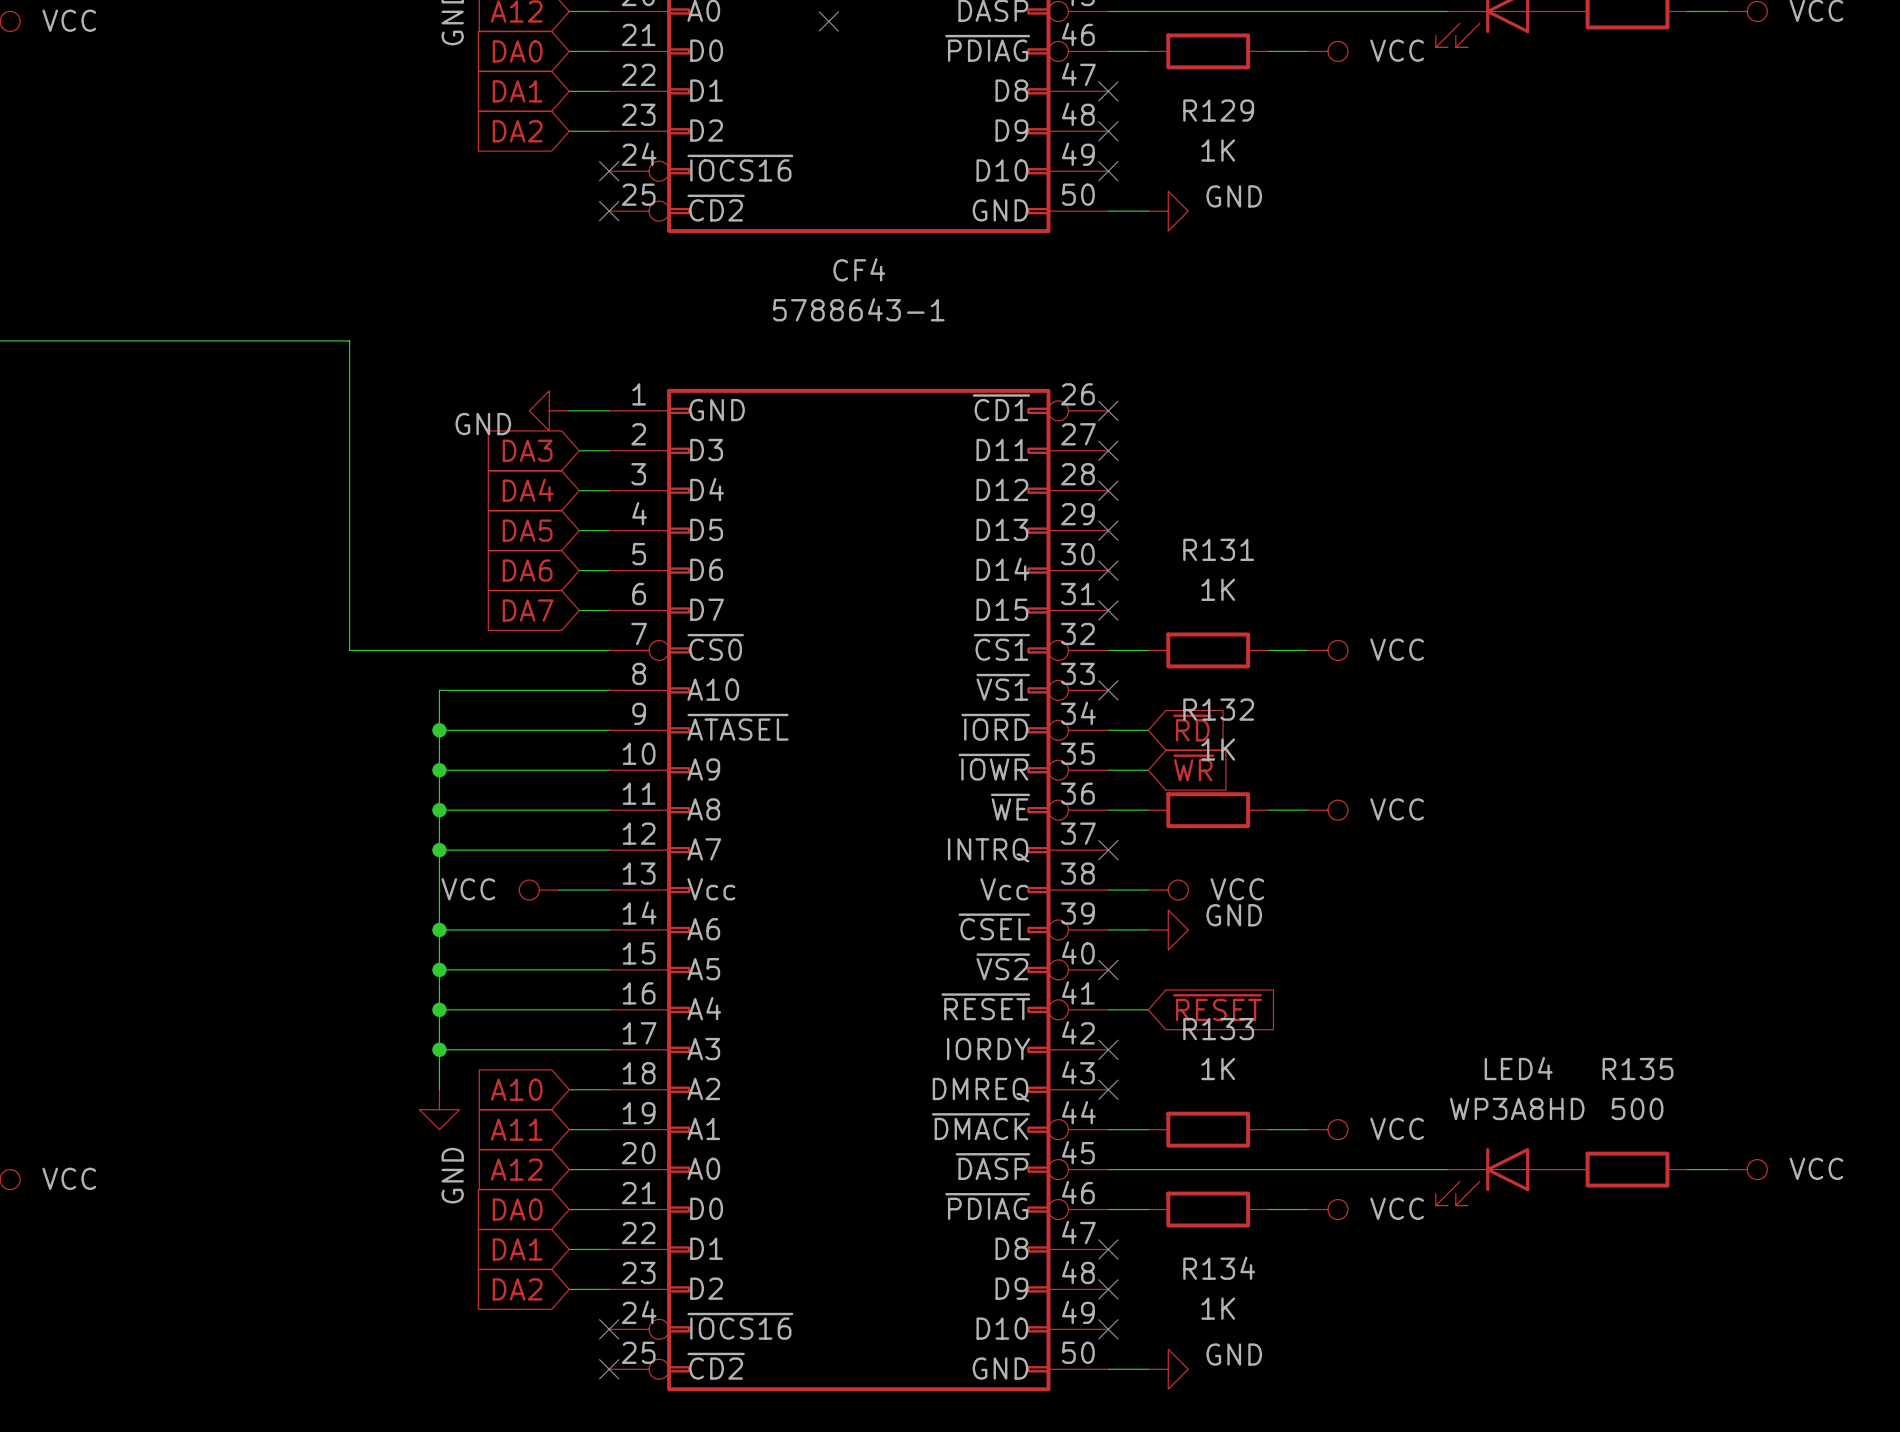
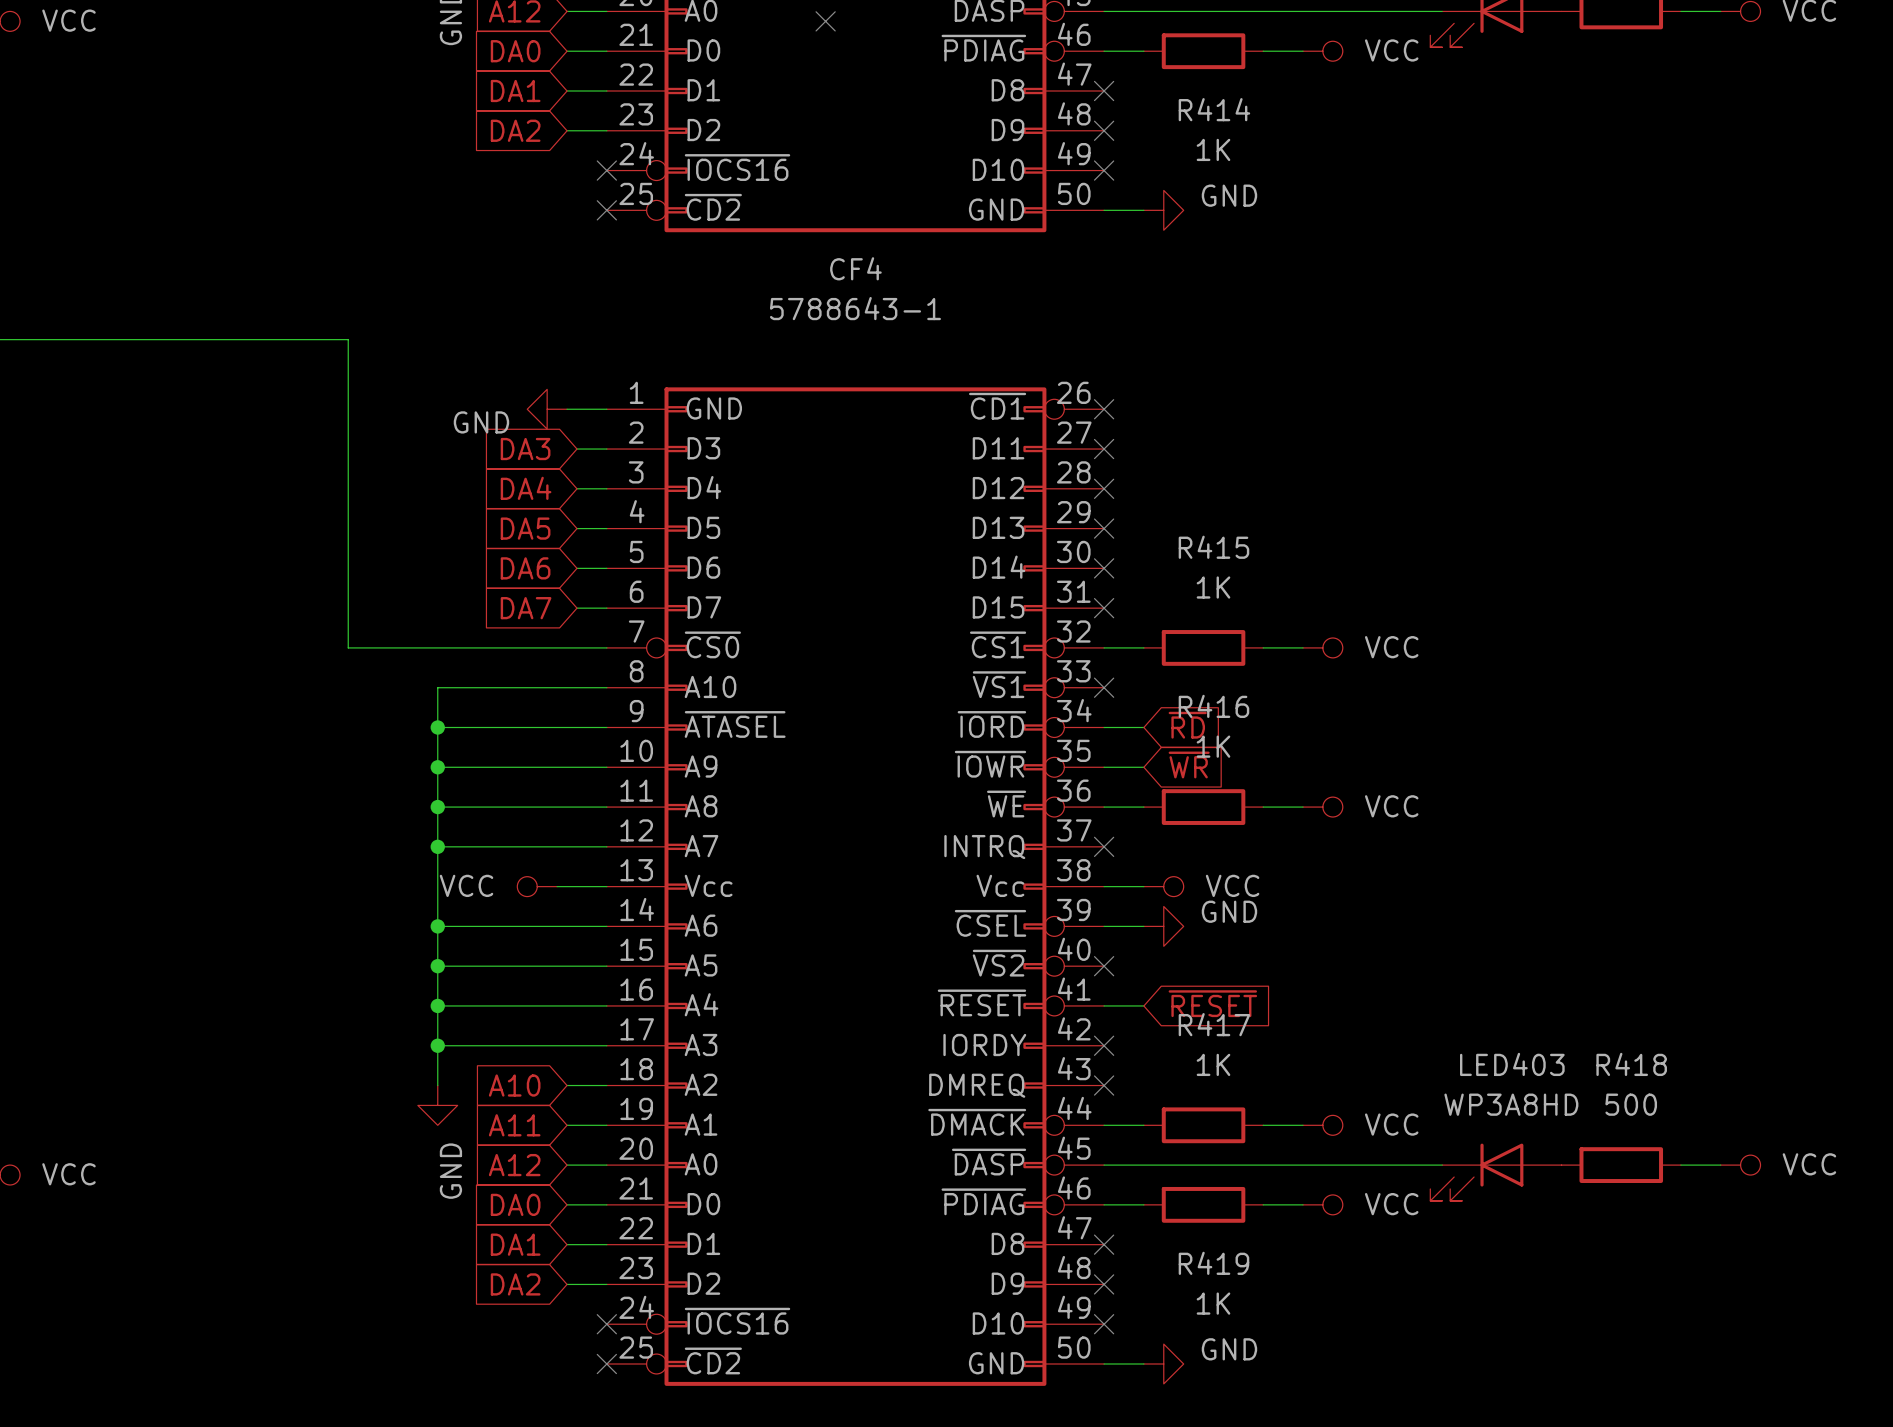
R129 name: R129 (1218, 110) -> R414 (1214, 109)
R131 name: R131 (1218, 549) -> R415 (1213, 547)
R132 name: R132 (1218, 709) -> R416 (1213, 706)
R133 name: R133 (1218, 1029) -> R417 (1214, 1024)
LED4 name: LED4 (1518, 1068) -> LED403 (1512, 1064)
R135 name: R135 (1637, 1069) -> R418 (1631, 1064)
R134 name: R134 (1219, 1268) -> R419 (1213, 1263)

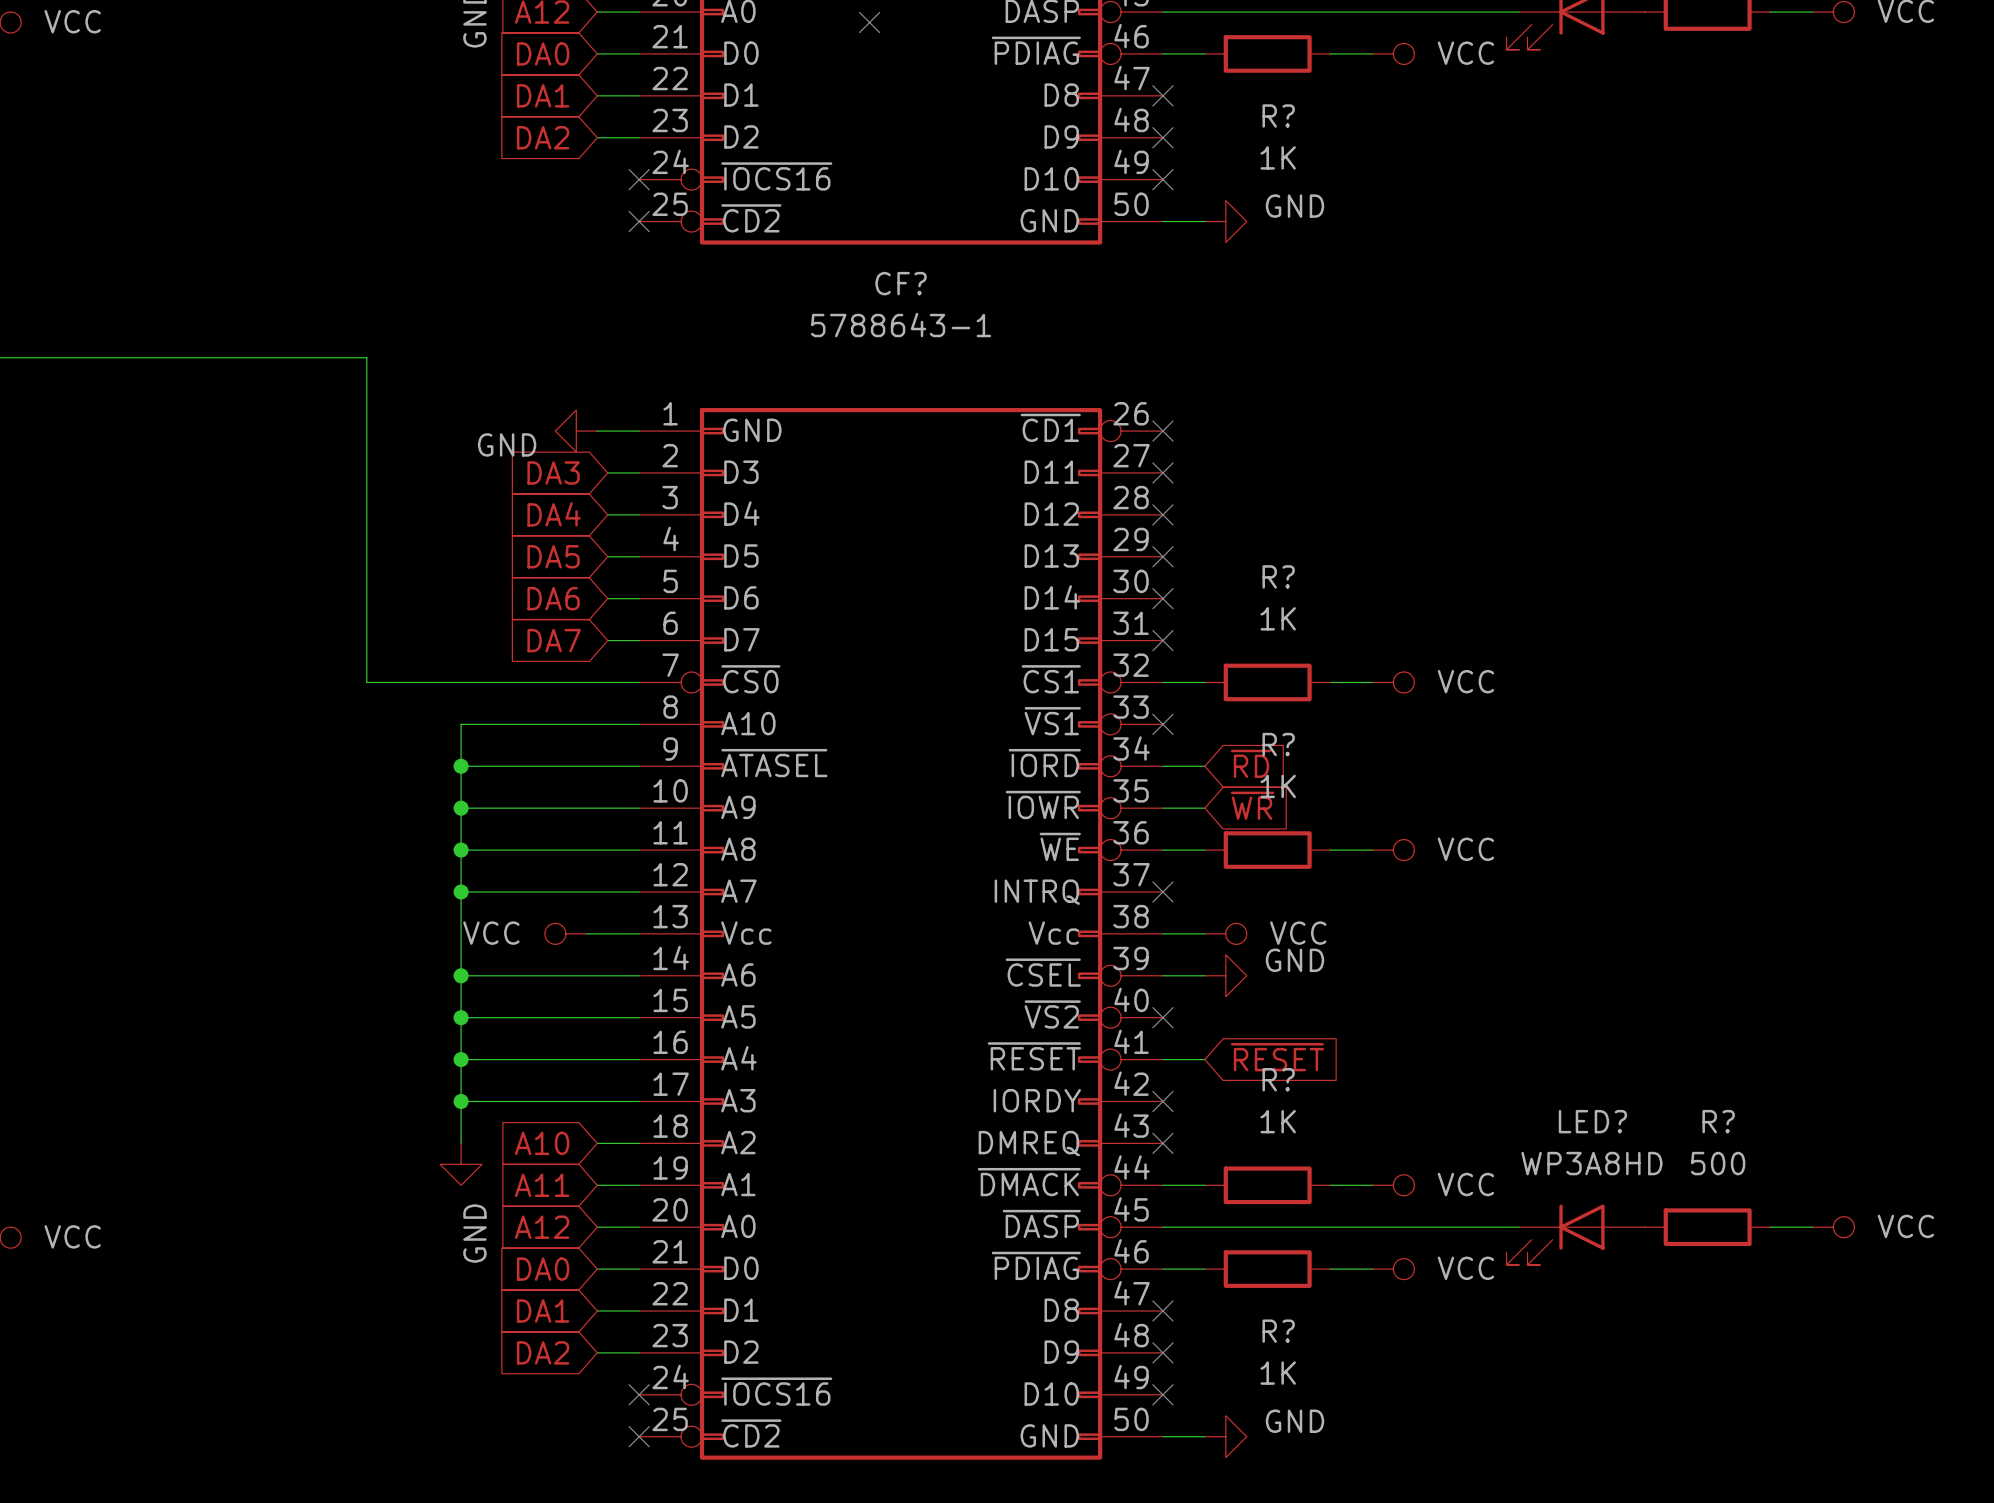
R414 name: R414 (1214, 109) -> R? (1278, 116)
CF4 name: CF4 (855, 268) -> CF? (901, 283)
R415 name: R415 (1213, 547) -> R? (1278, 576)
R416 name: R416 (1213, 706) -> R? (1278, 744)
R417 name: R417 (1214, 1024) -> R? (1278, 1079)
LED403 name: LED403 (1512, 1064) -> LED? (1592, 1121)
R418 name: R418 (1631, 1064) -> R? (1718, 1121)
R419 name: R419 (1213, 1263) -> R? (1278, 1331)

